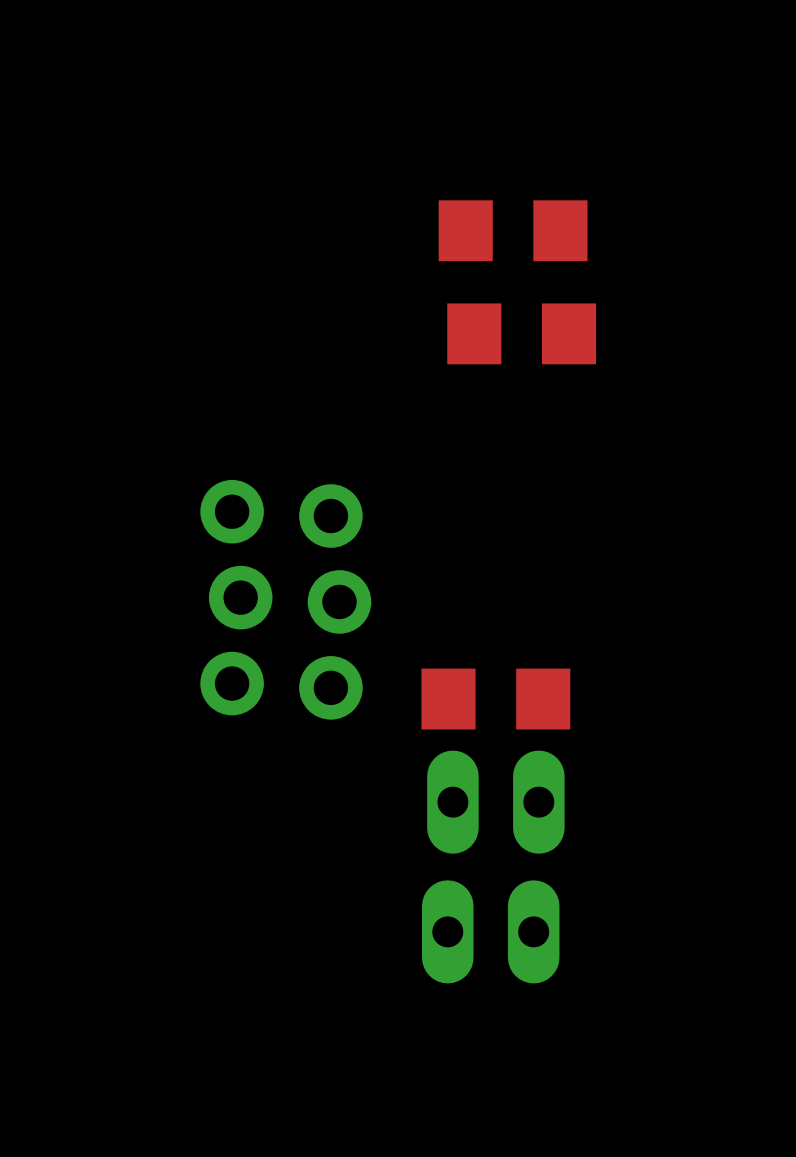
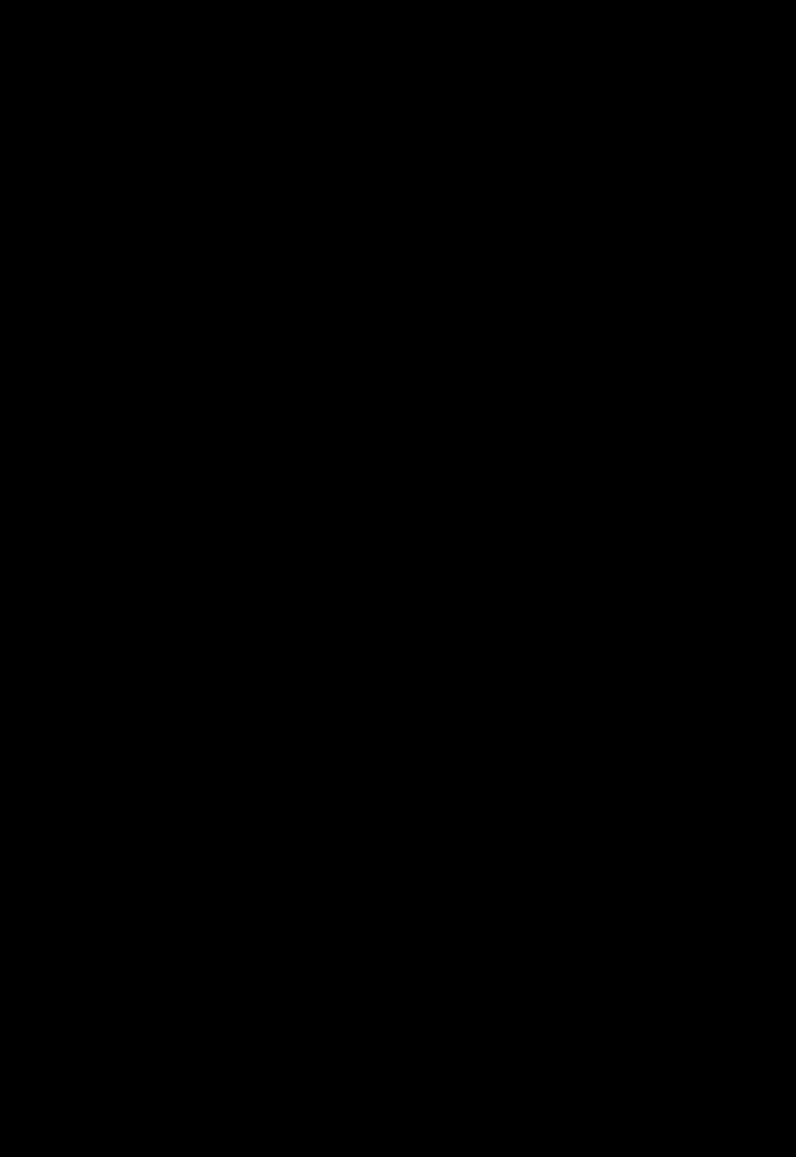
part: (513, 230) -> none
part: (521, 333) -> none
part: (236, 597) -> none
part: (335, 601) -> none
part: (495, 699) -> none
part: (495, 802) -> none
part: (490, 931) -> none

